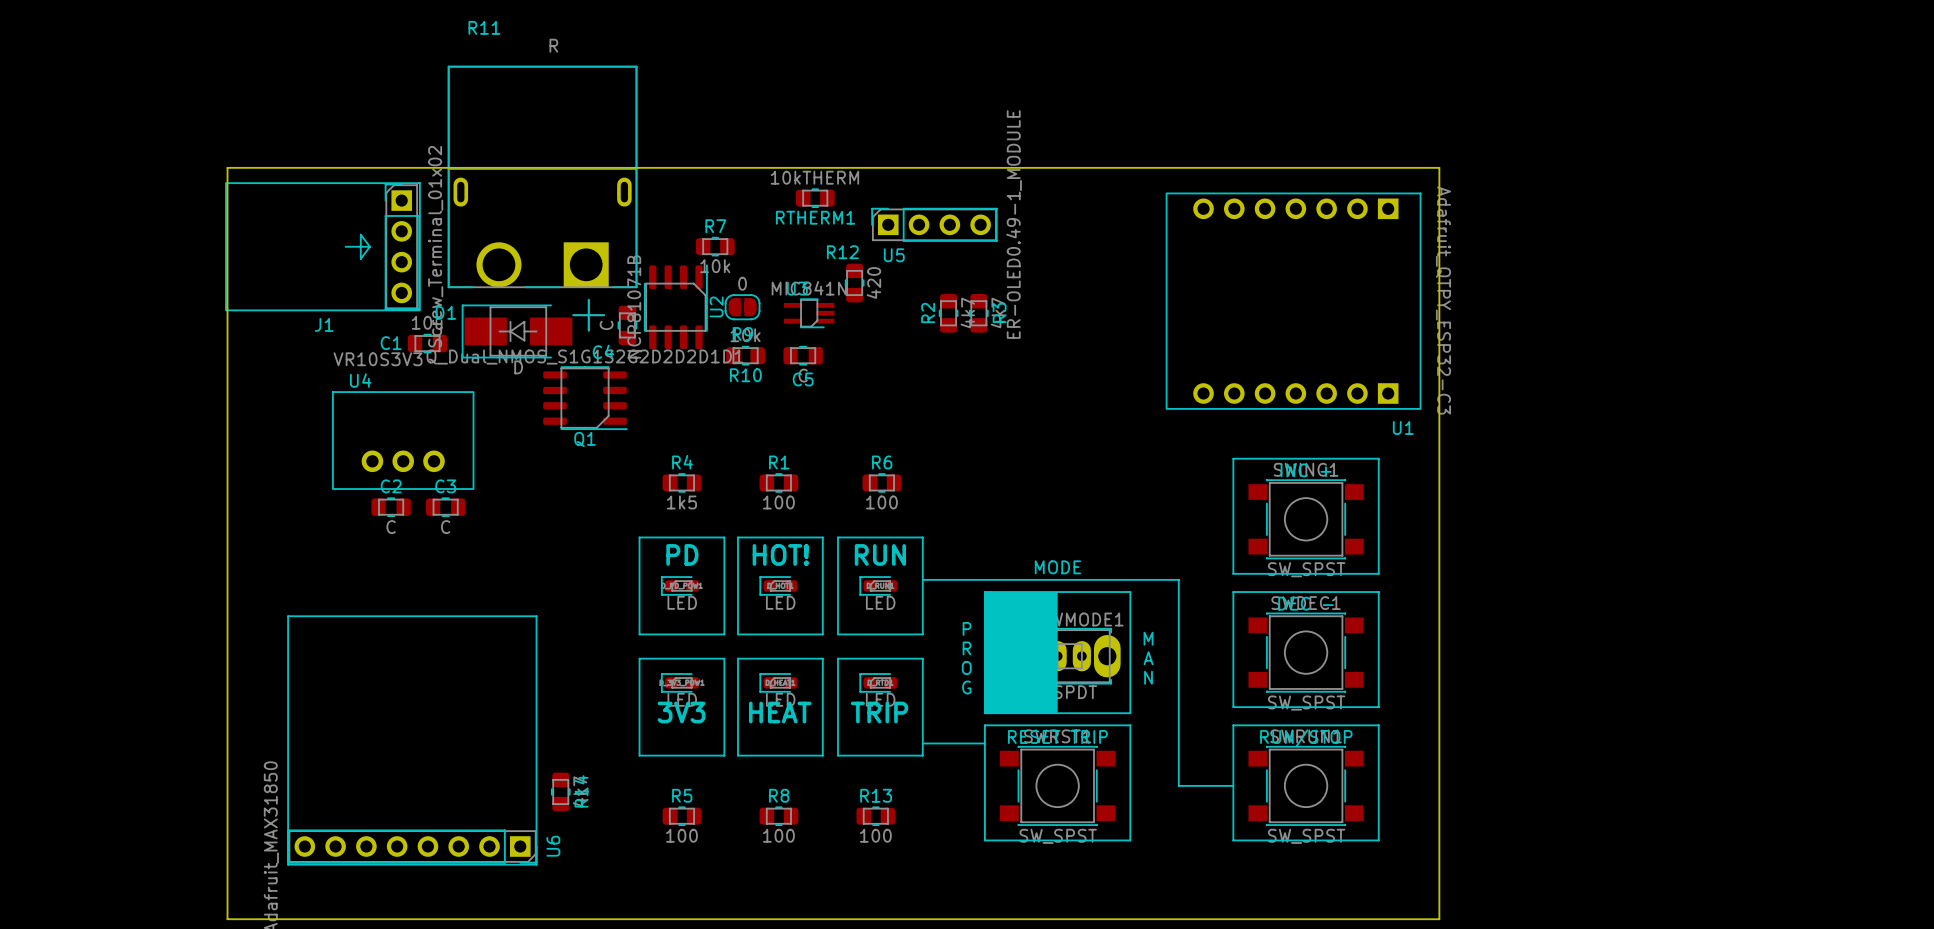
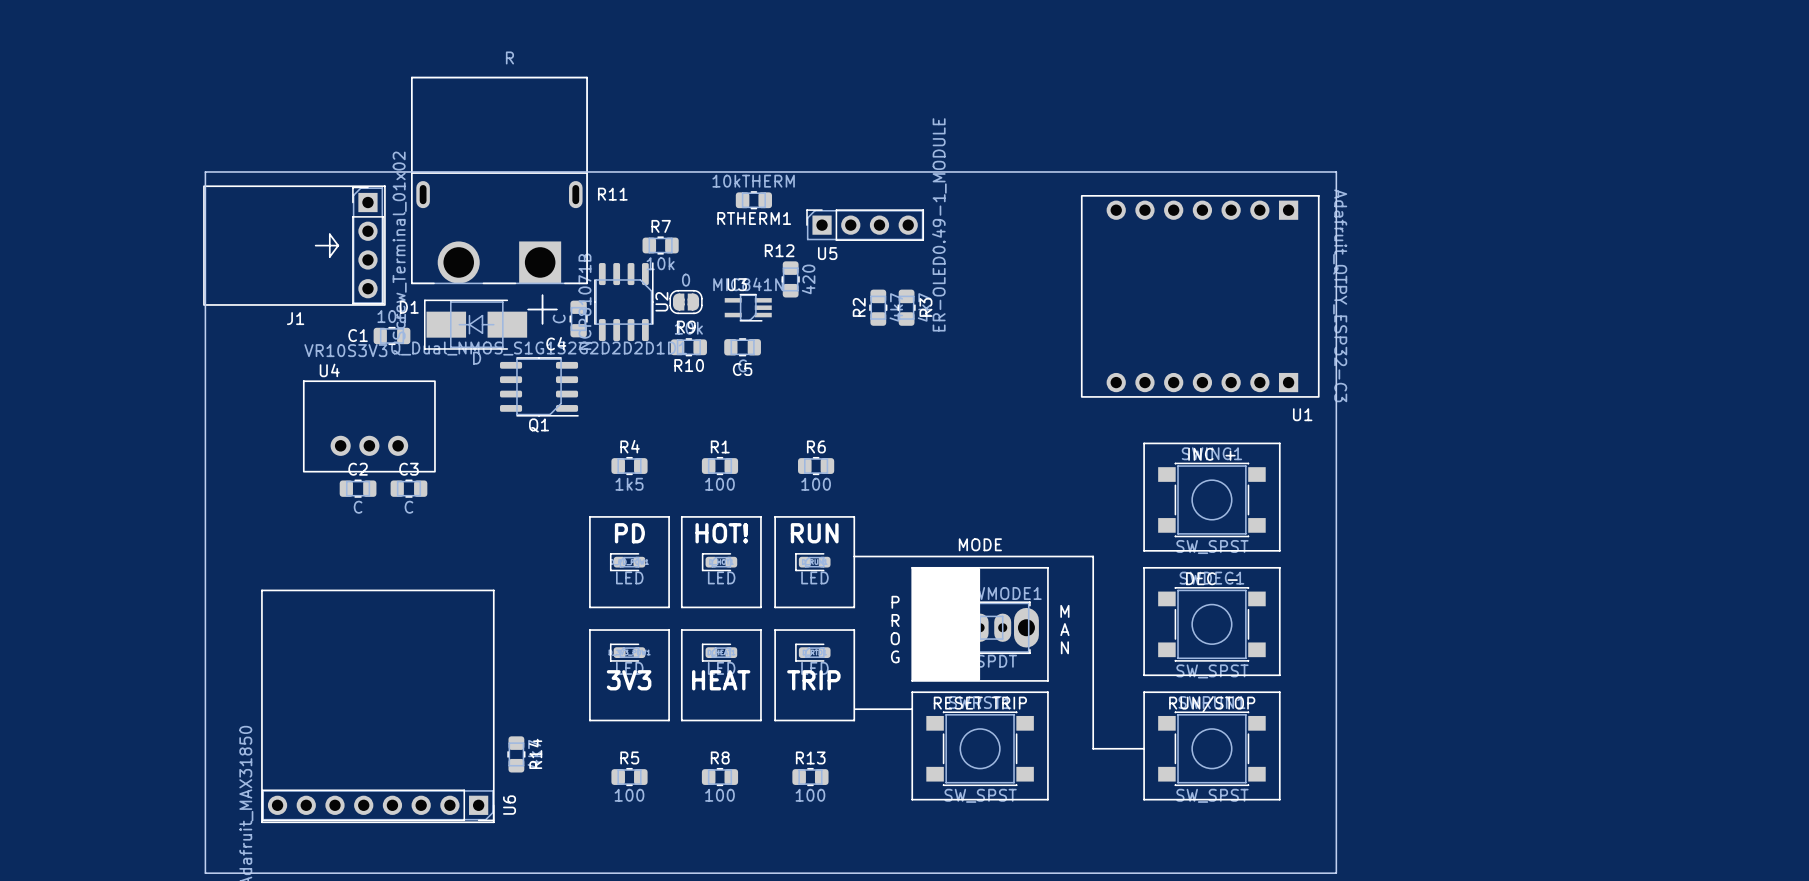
R11 name position: R11 (484, 27) -> R11 (612, 194)

